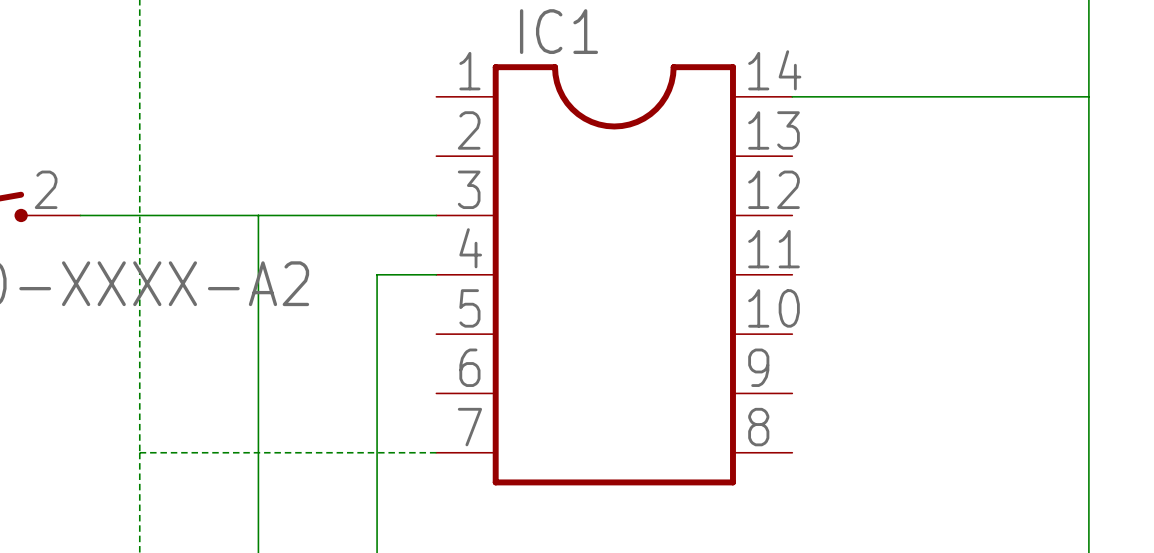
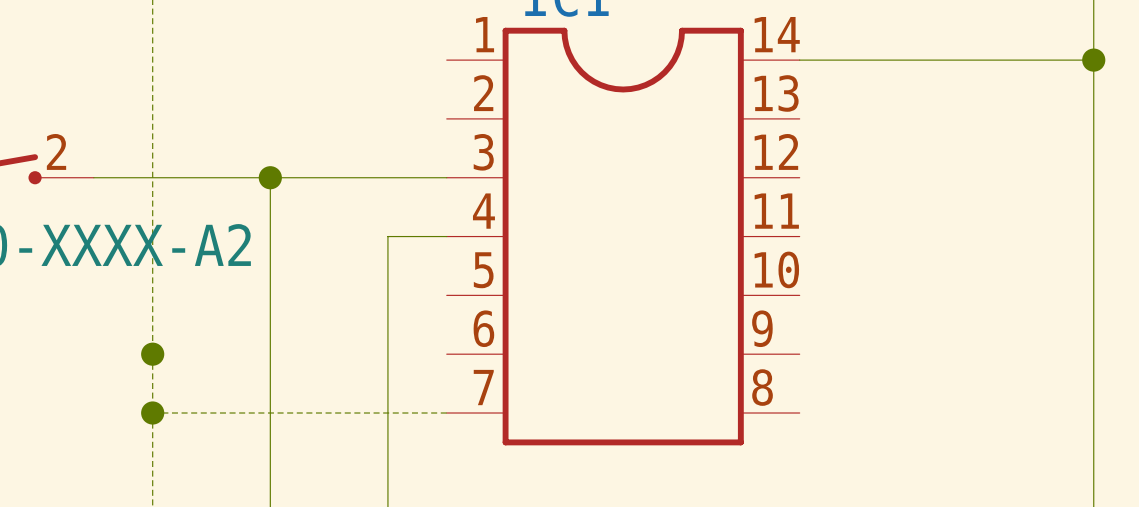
junction: none -> (1093, 60)
junction: none -> (270, 177)
junction: none -> (152, 354)
junction: none -> (152, 413)

